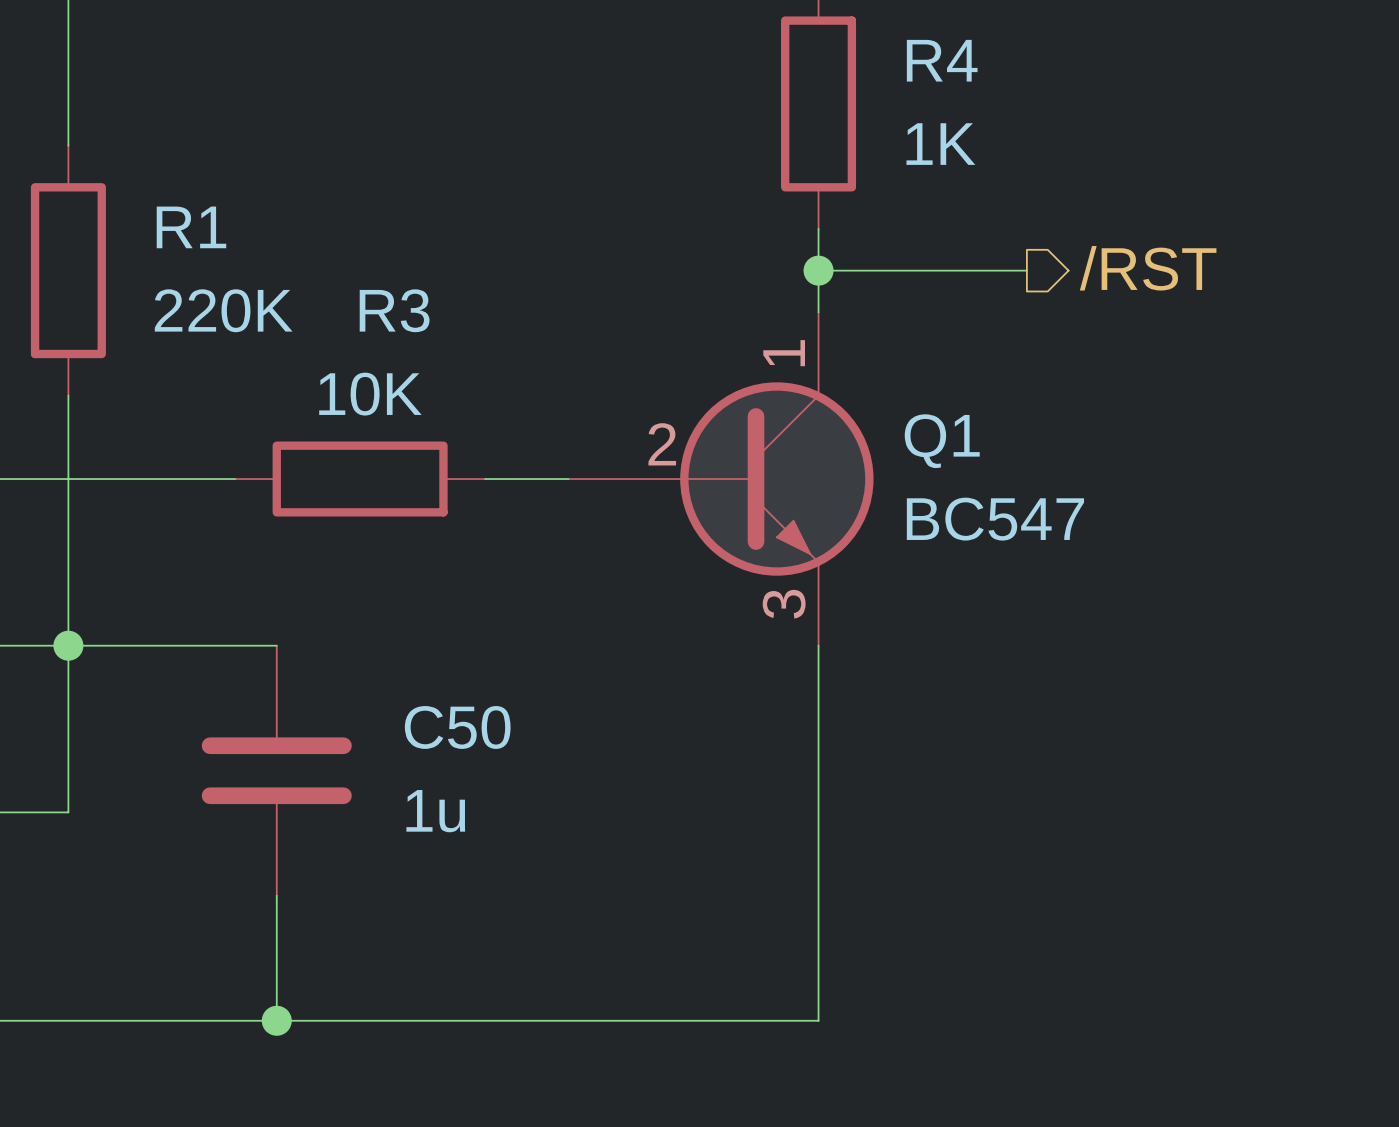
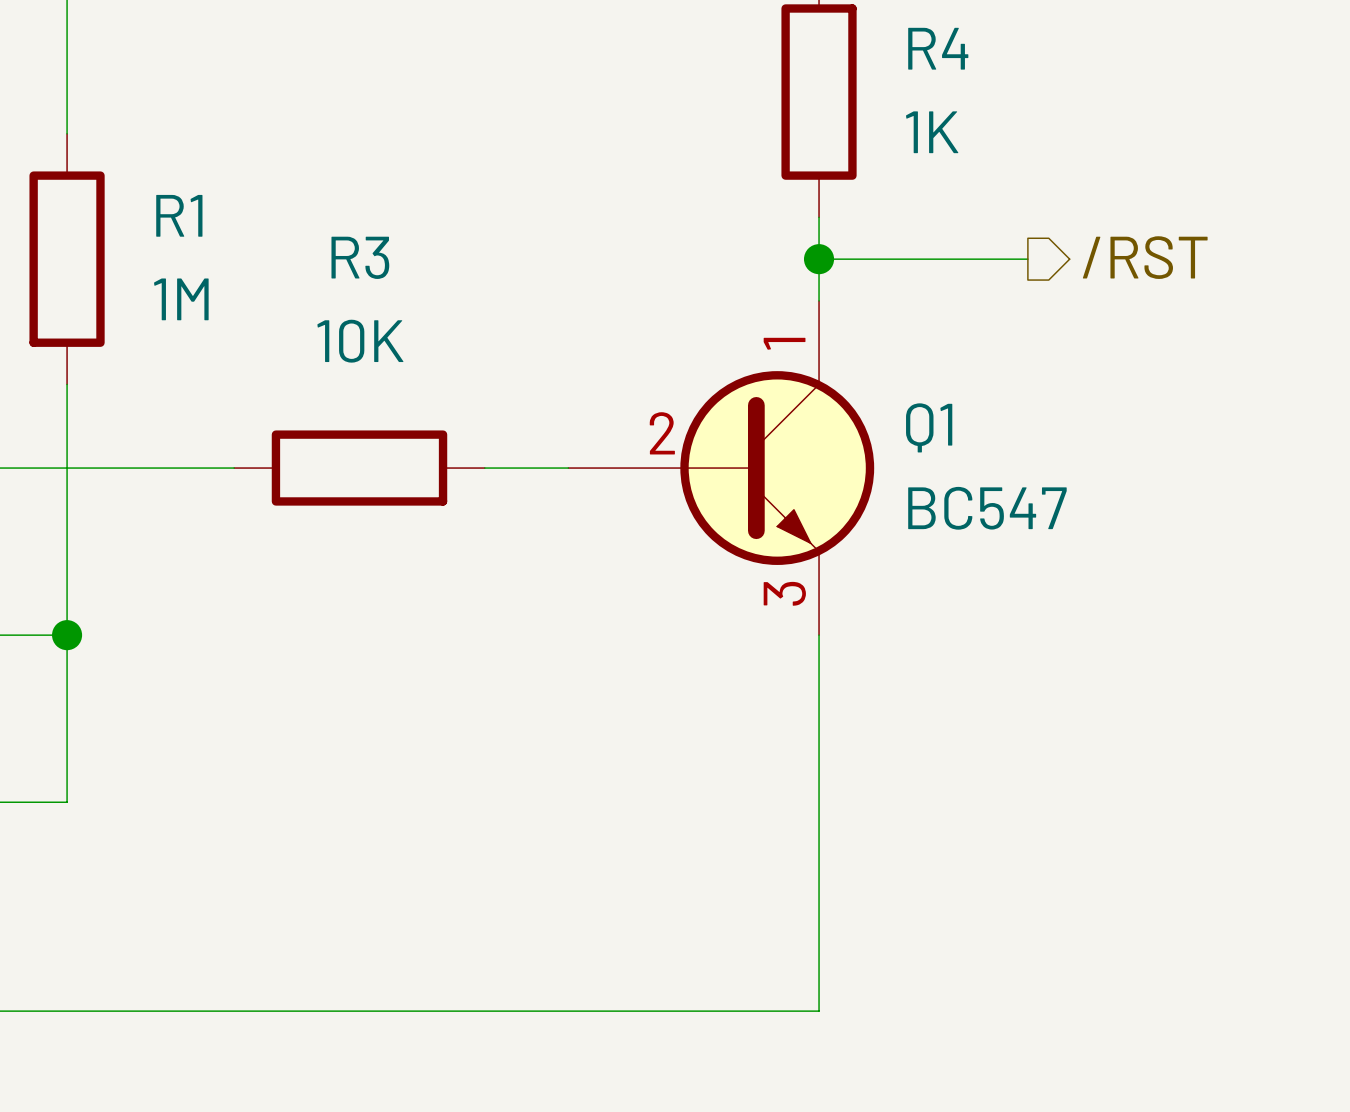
R1 value: 220K (223, 310) -> 1M (181, 299)
R3 name position: R3 (394, 310) -> R3 (360, 257)
R3 value position: 10K (370, 394) -> 10K (360, 341)
wire: (68, 645) (276, 645) -> none
C50: 1u (276, 770) -> none
wire: (276, 895) (276, 1020) -> none
junction: (276, 1020) -> none

